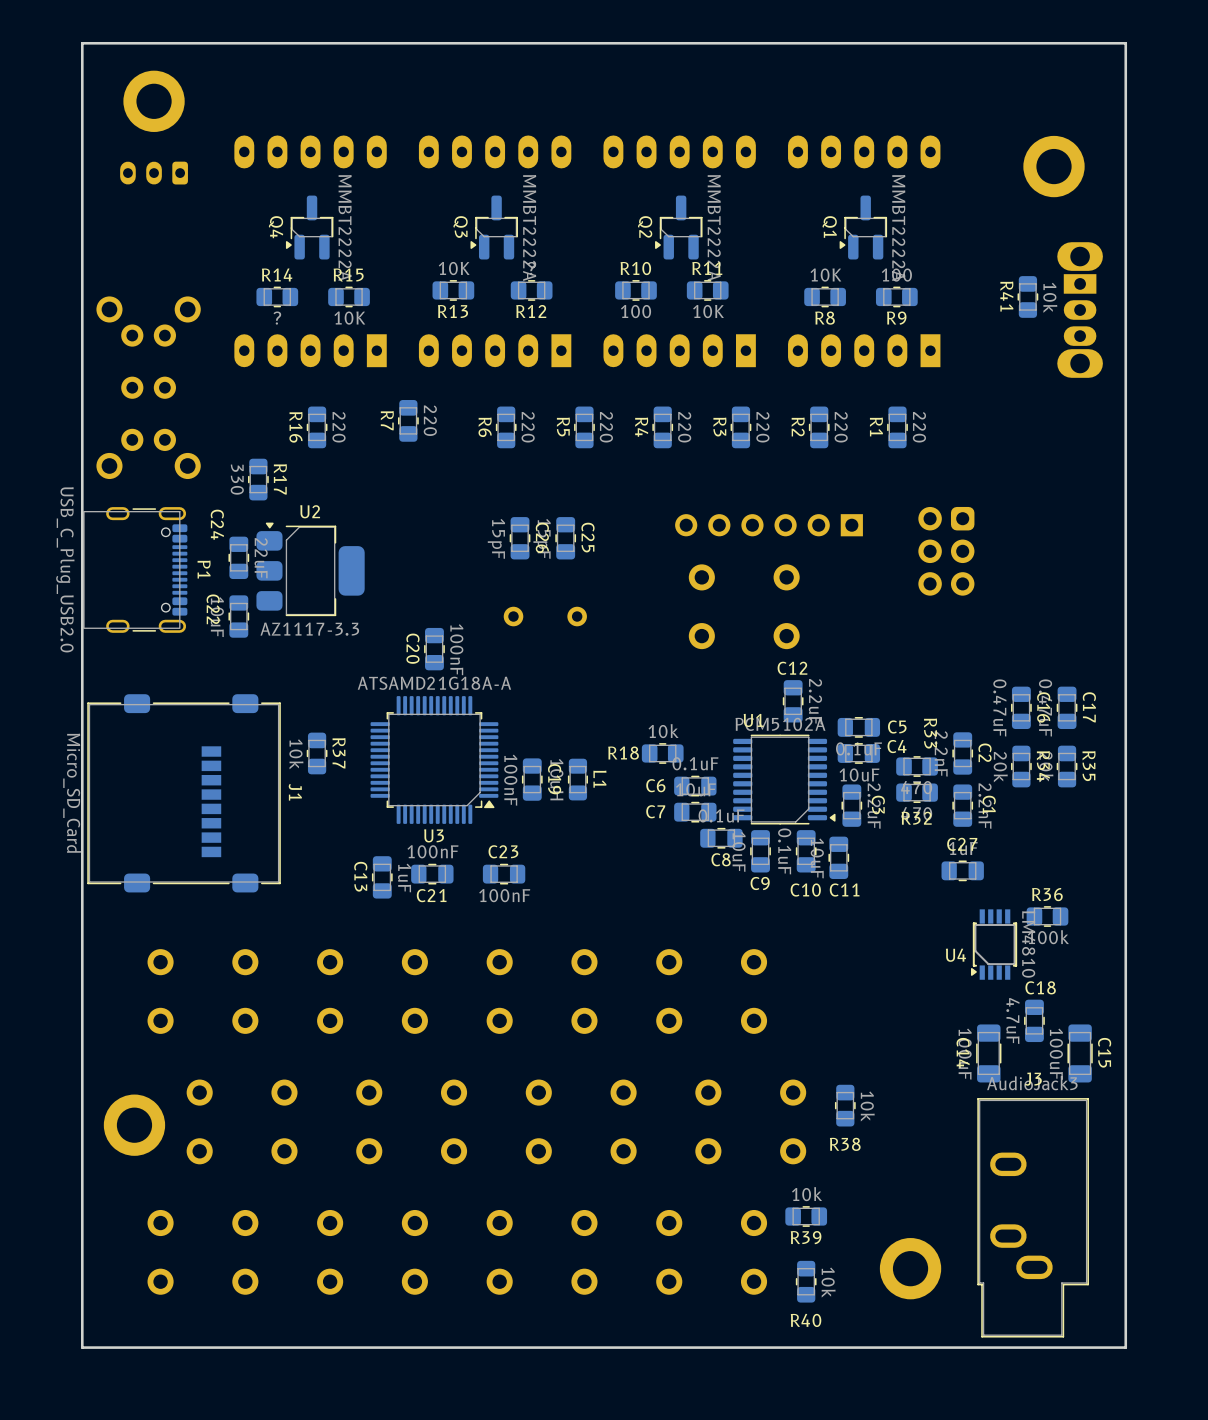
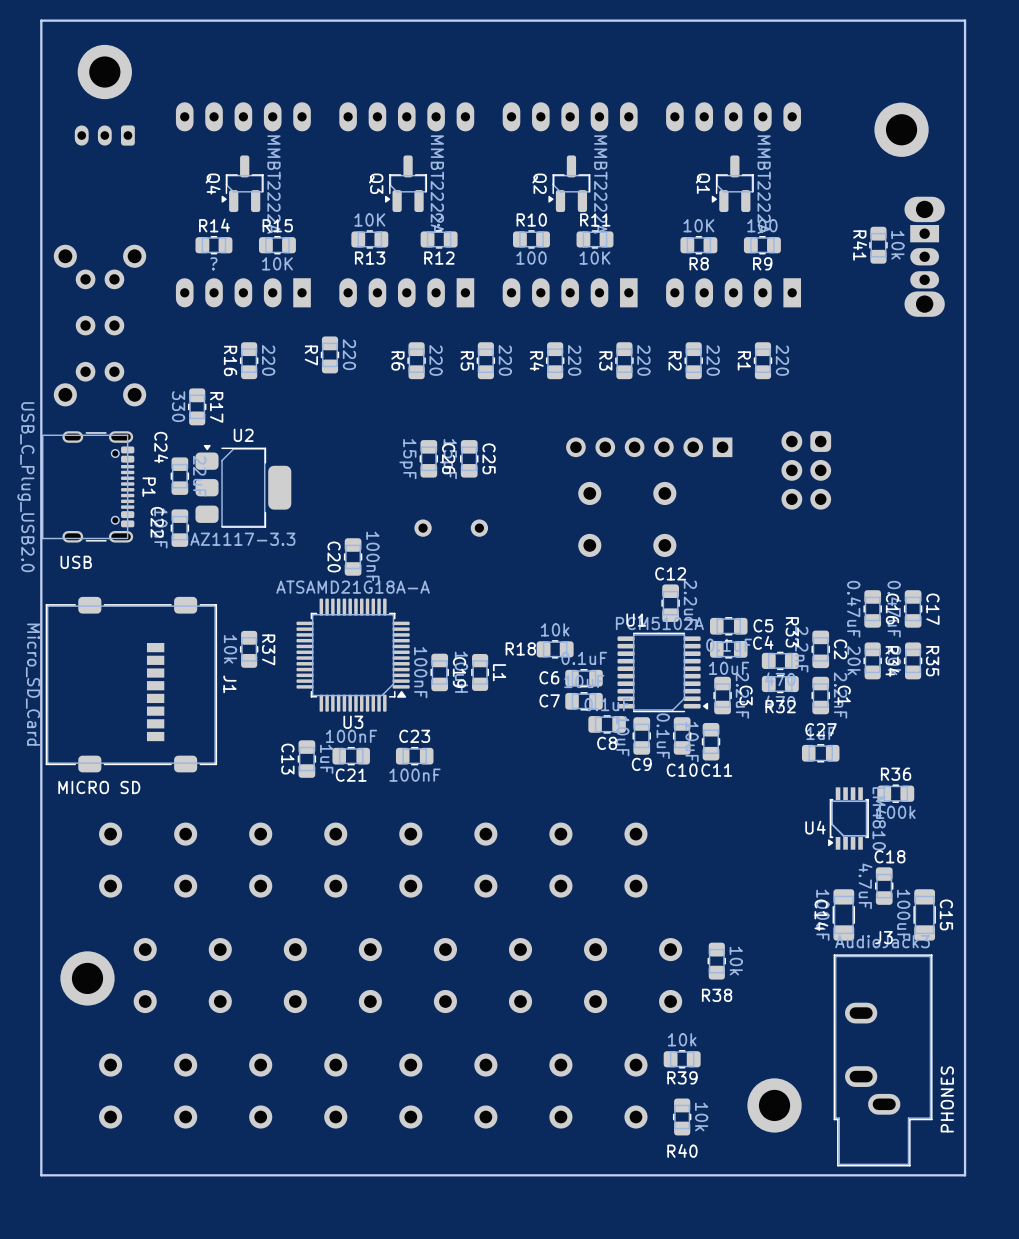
text: none -> USB (76, 562)
text: none -> MICRO SD (99, 787)
text: none -> PHONES (947, 1099)

